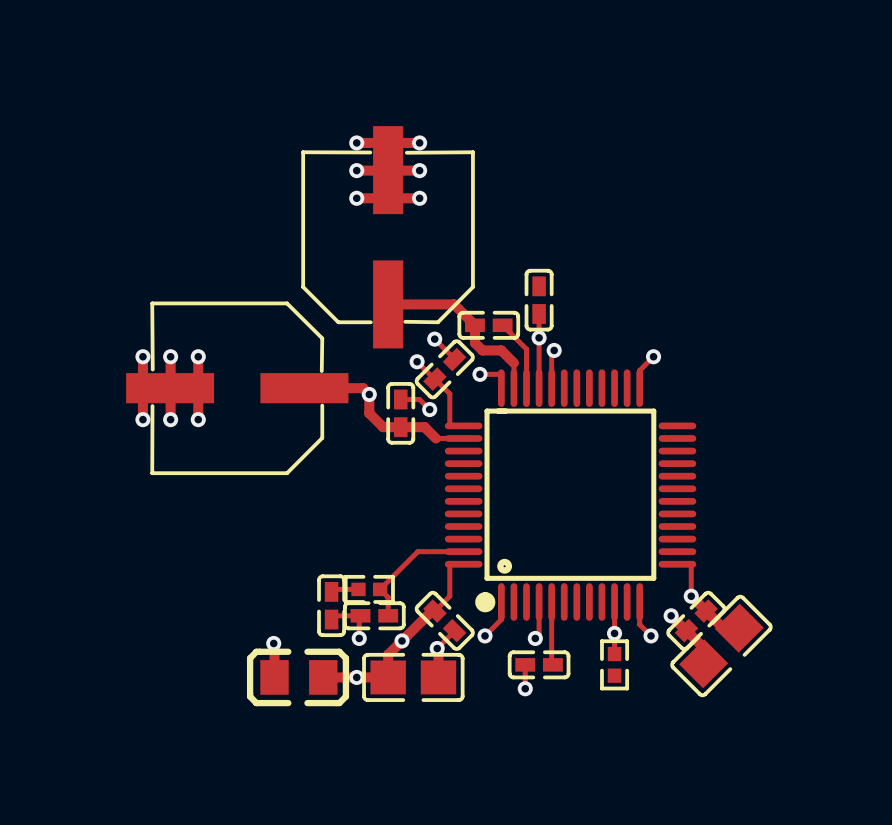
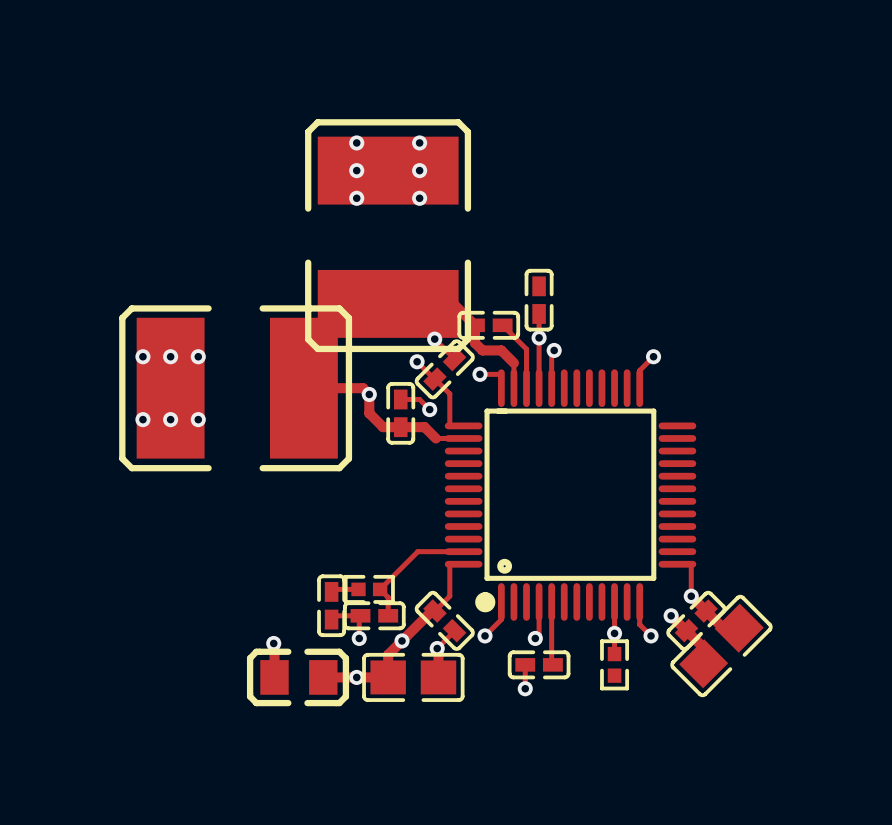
part footprint: [301, 126, 475, 349] -> [305, 119, 472, 353]
part footprint: [126, 301, 349, 476] -> [119, 305, 353, 472]

